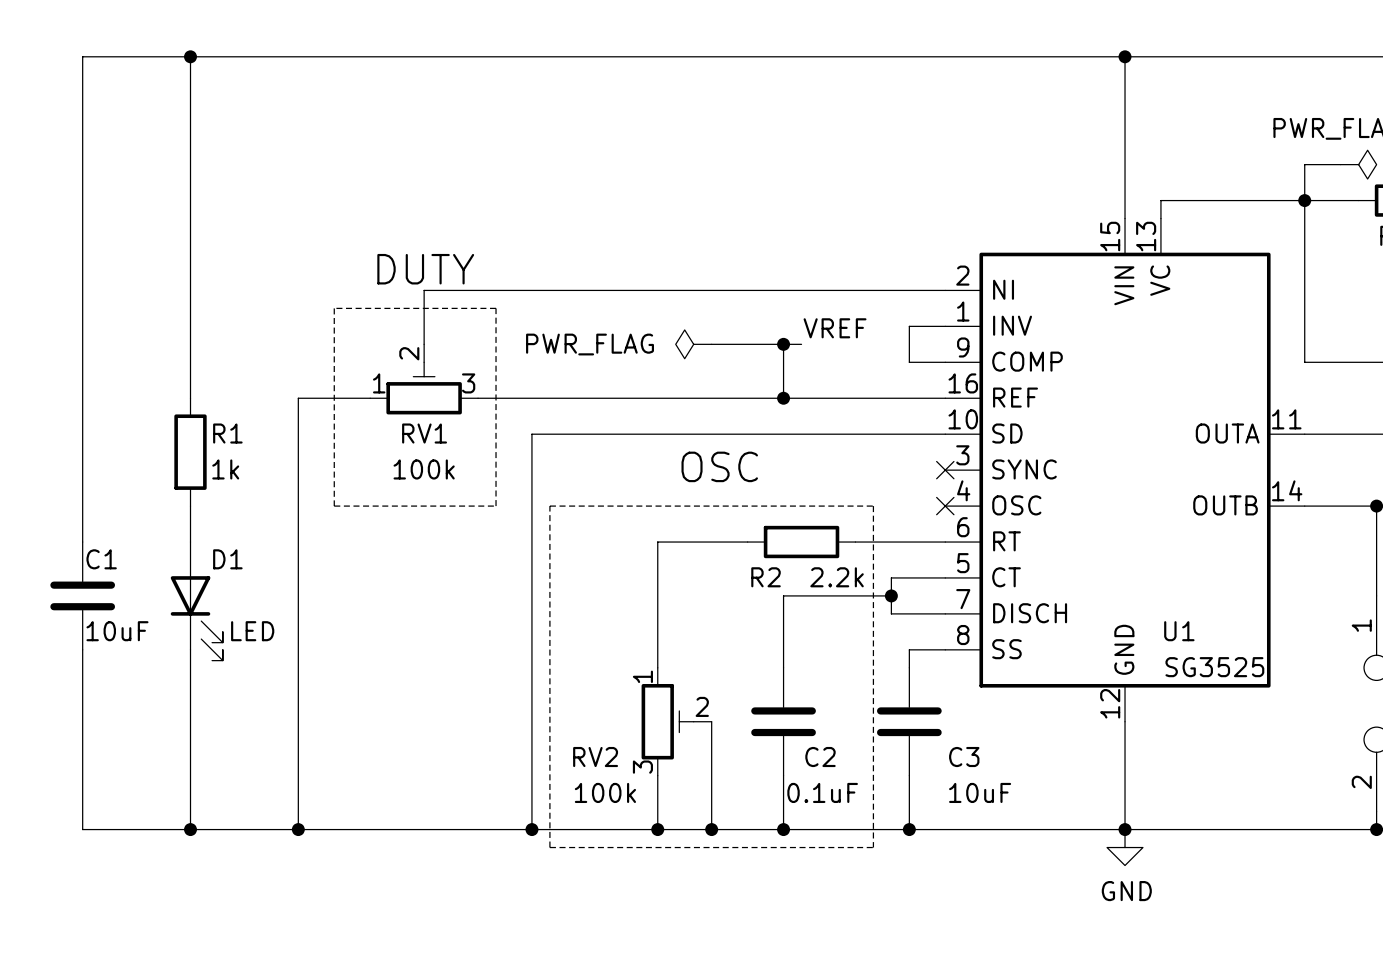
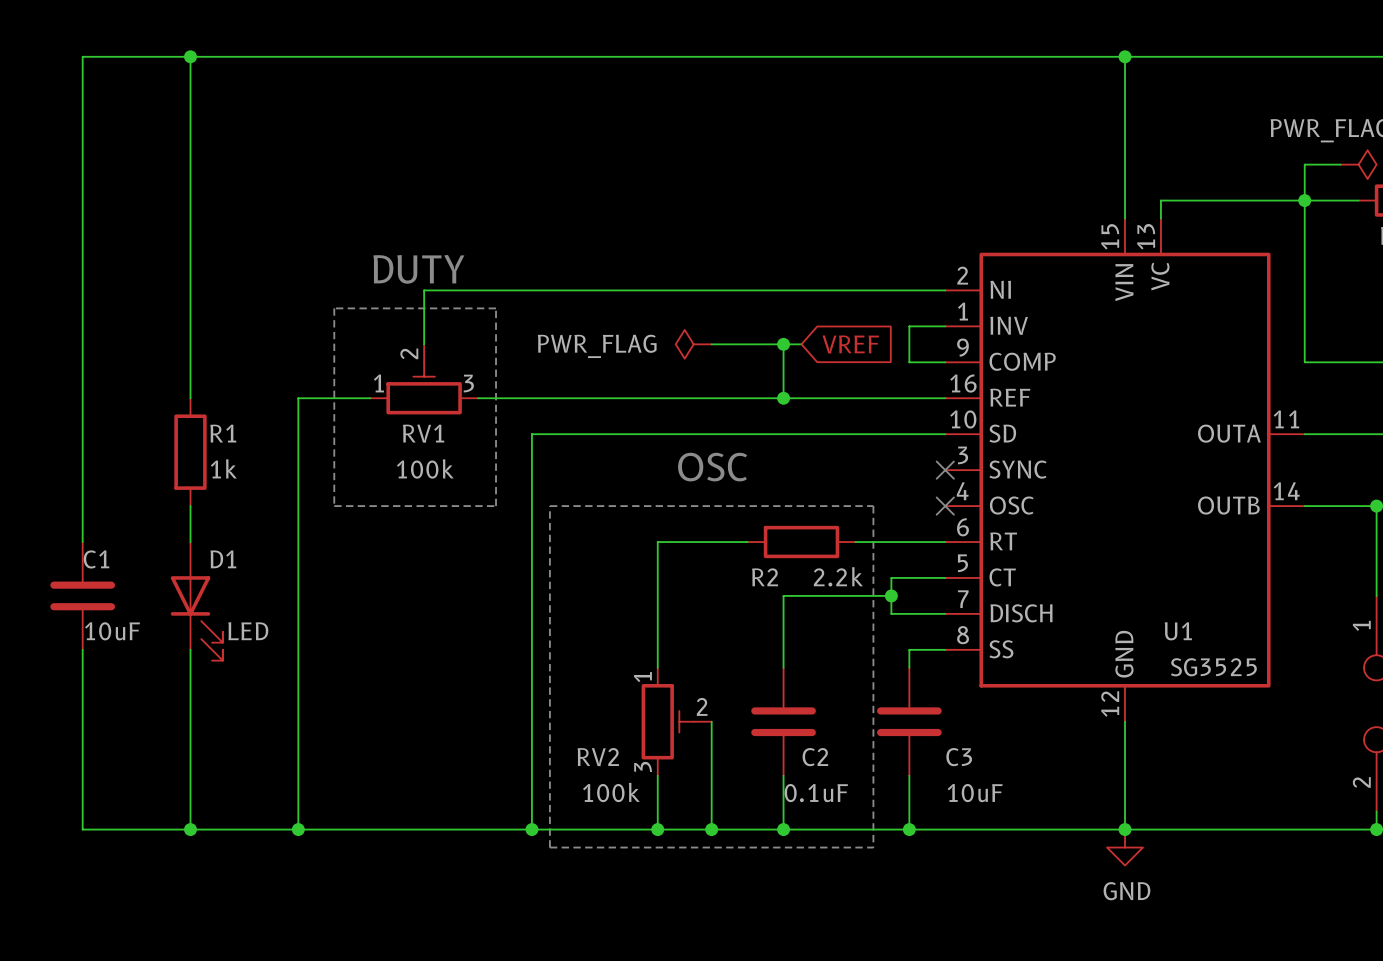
label: VREF (835, 328) -> none
global label: none -> VREF (850, 344)

